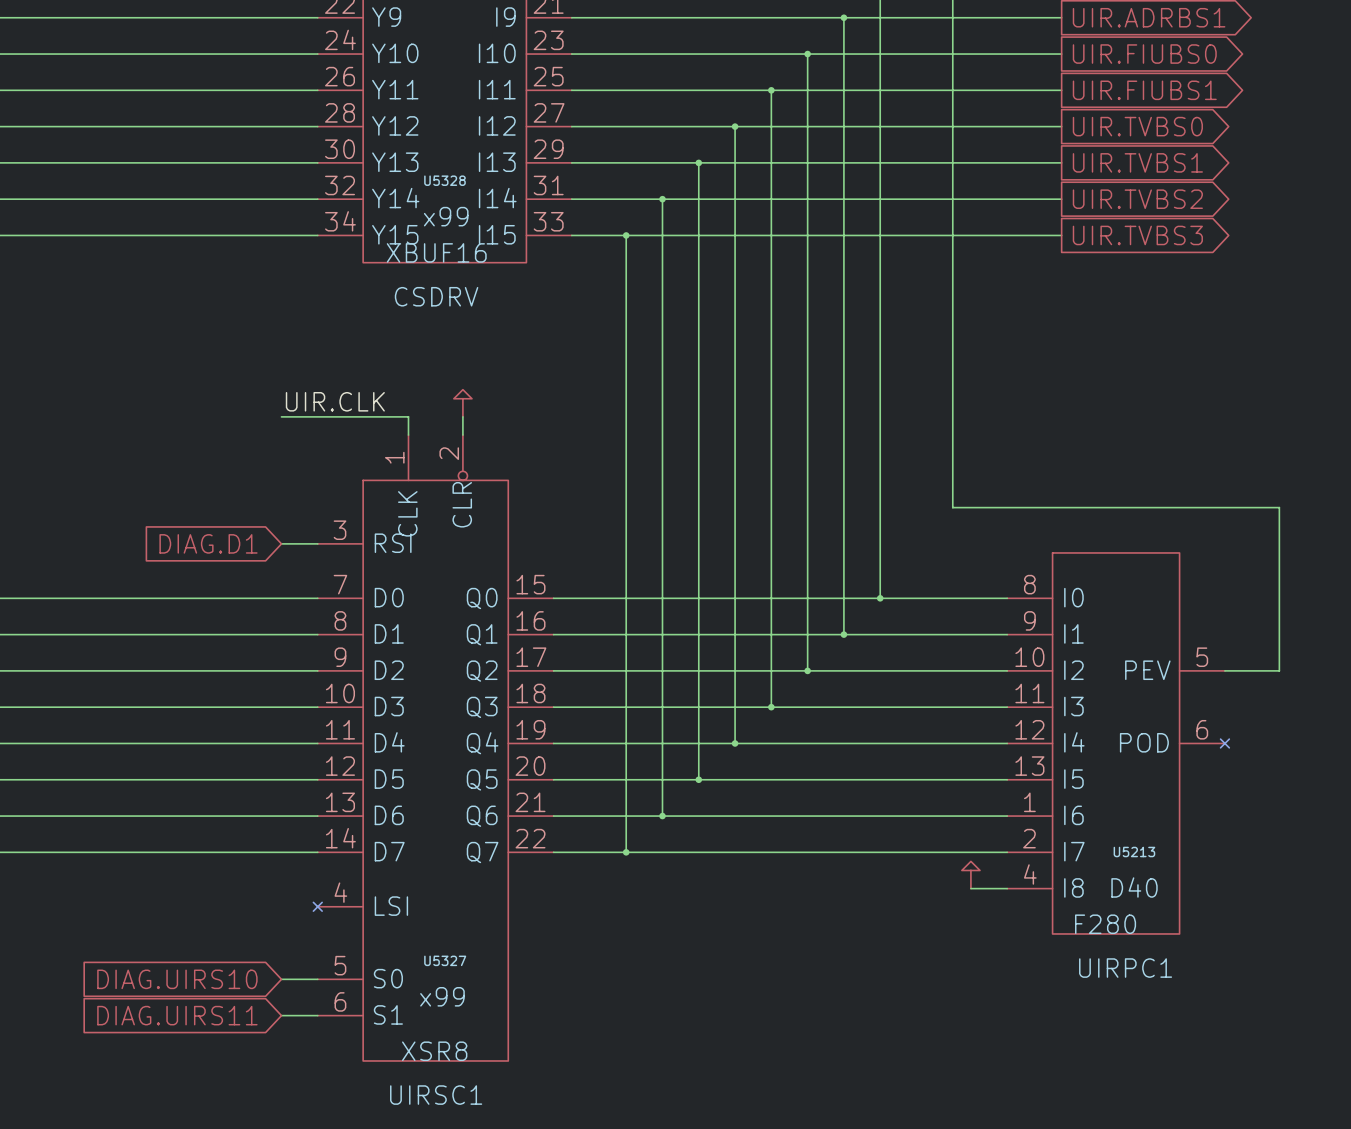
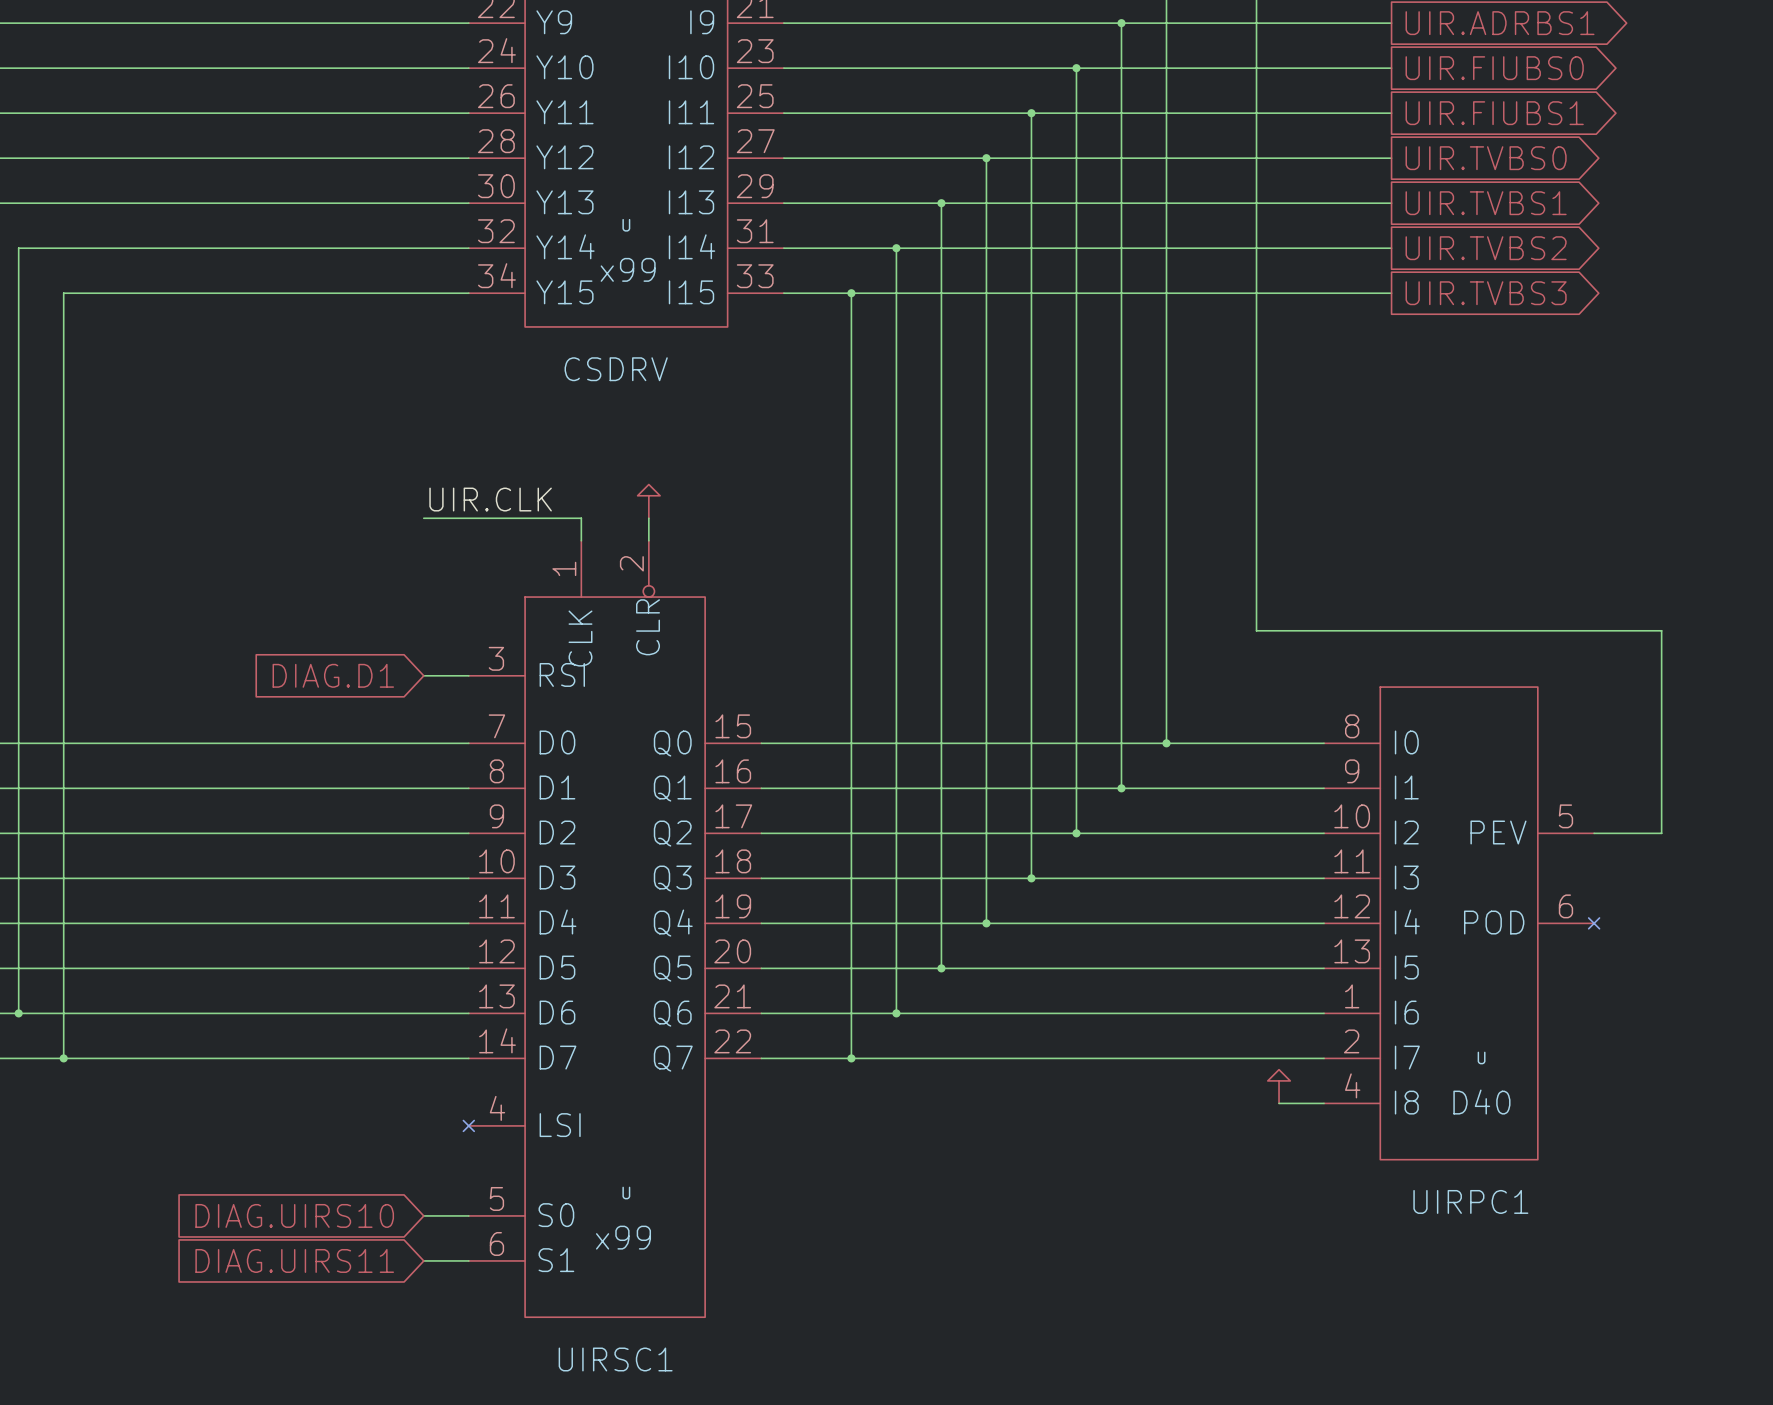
U5328 name: U5328 (444, 180) -> U (626, 225)
U5328 value: XBUF16 (436, 252) -> none
U5213 name: U5213 (1134, 851) -> U (1481, 1057)
U5213 value: F280 (1105, 924) -> none
U5327 name: U5327 (445, 960) -> U (626, 1193)
U5327 value: XSR8 (434, 1051) -> none

